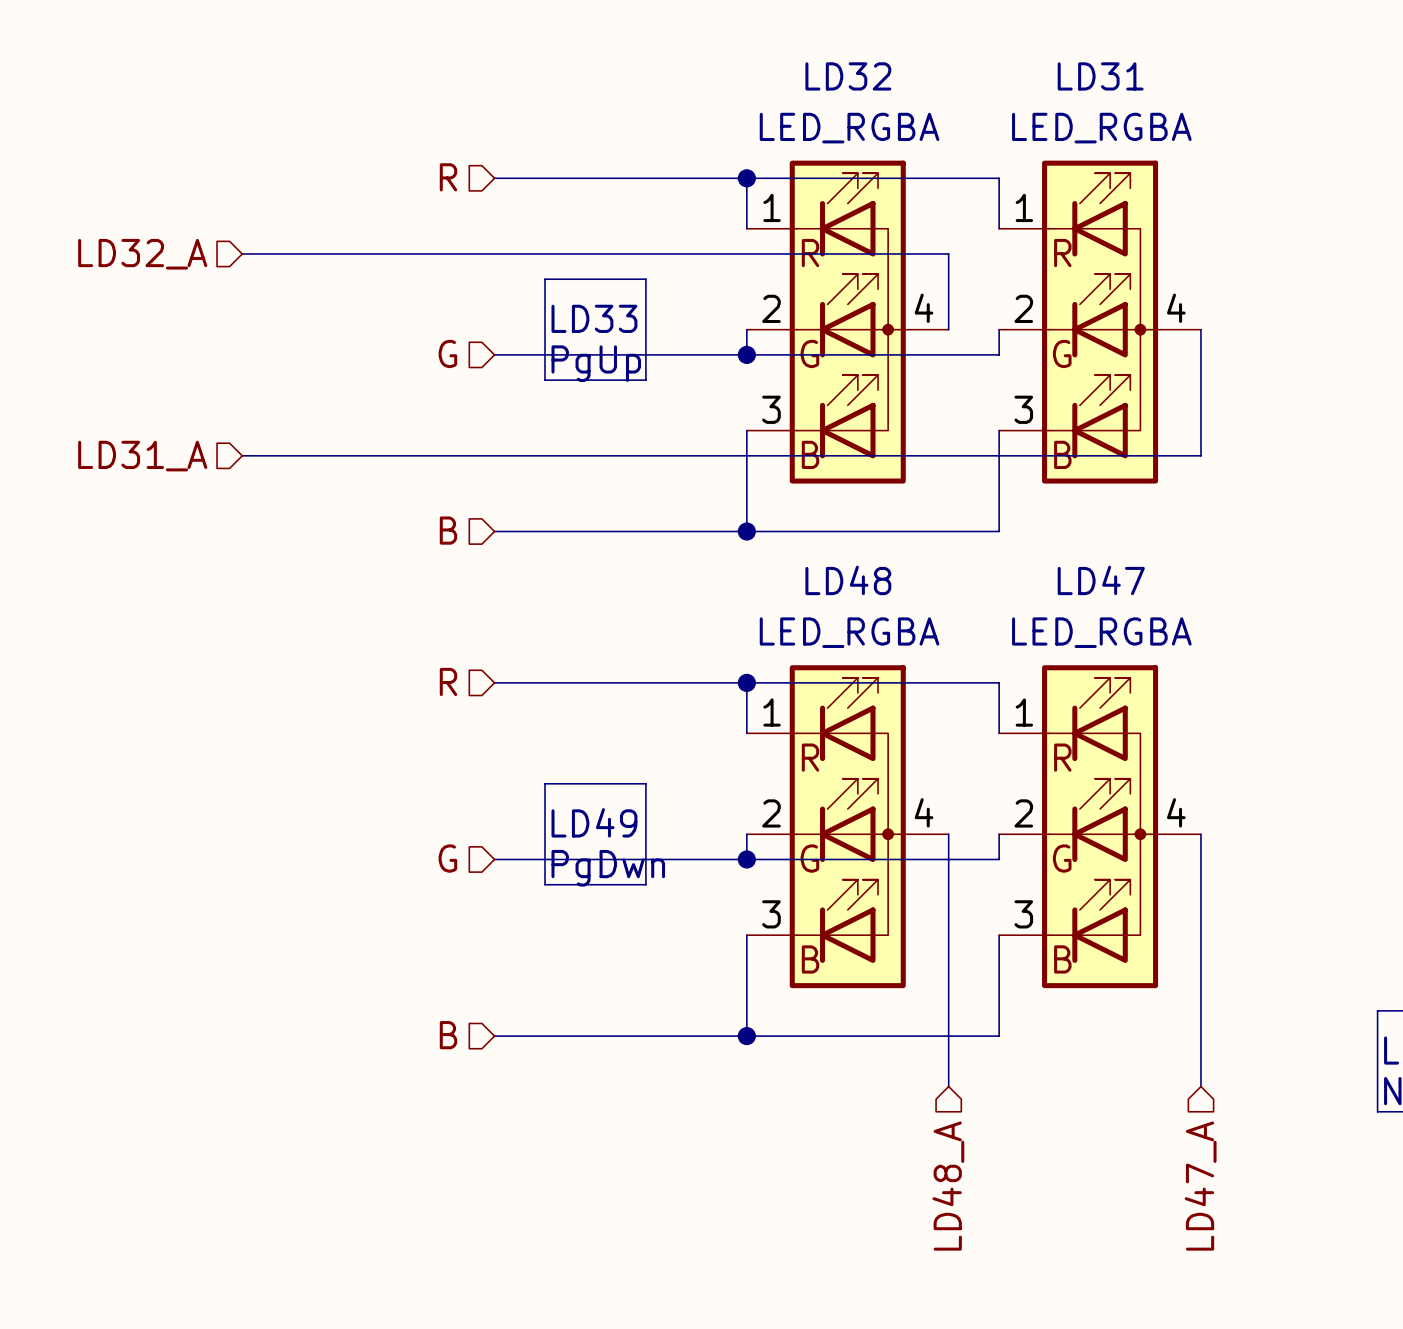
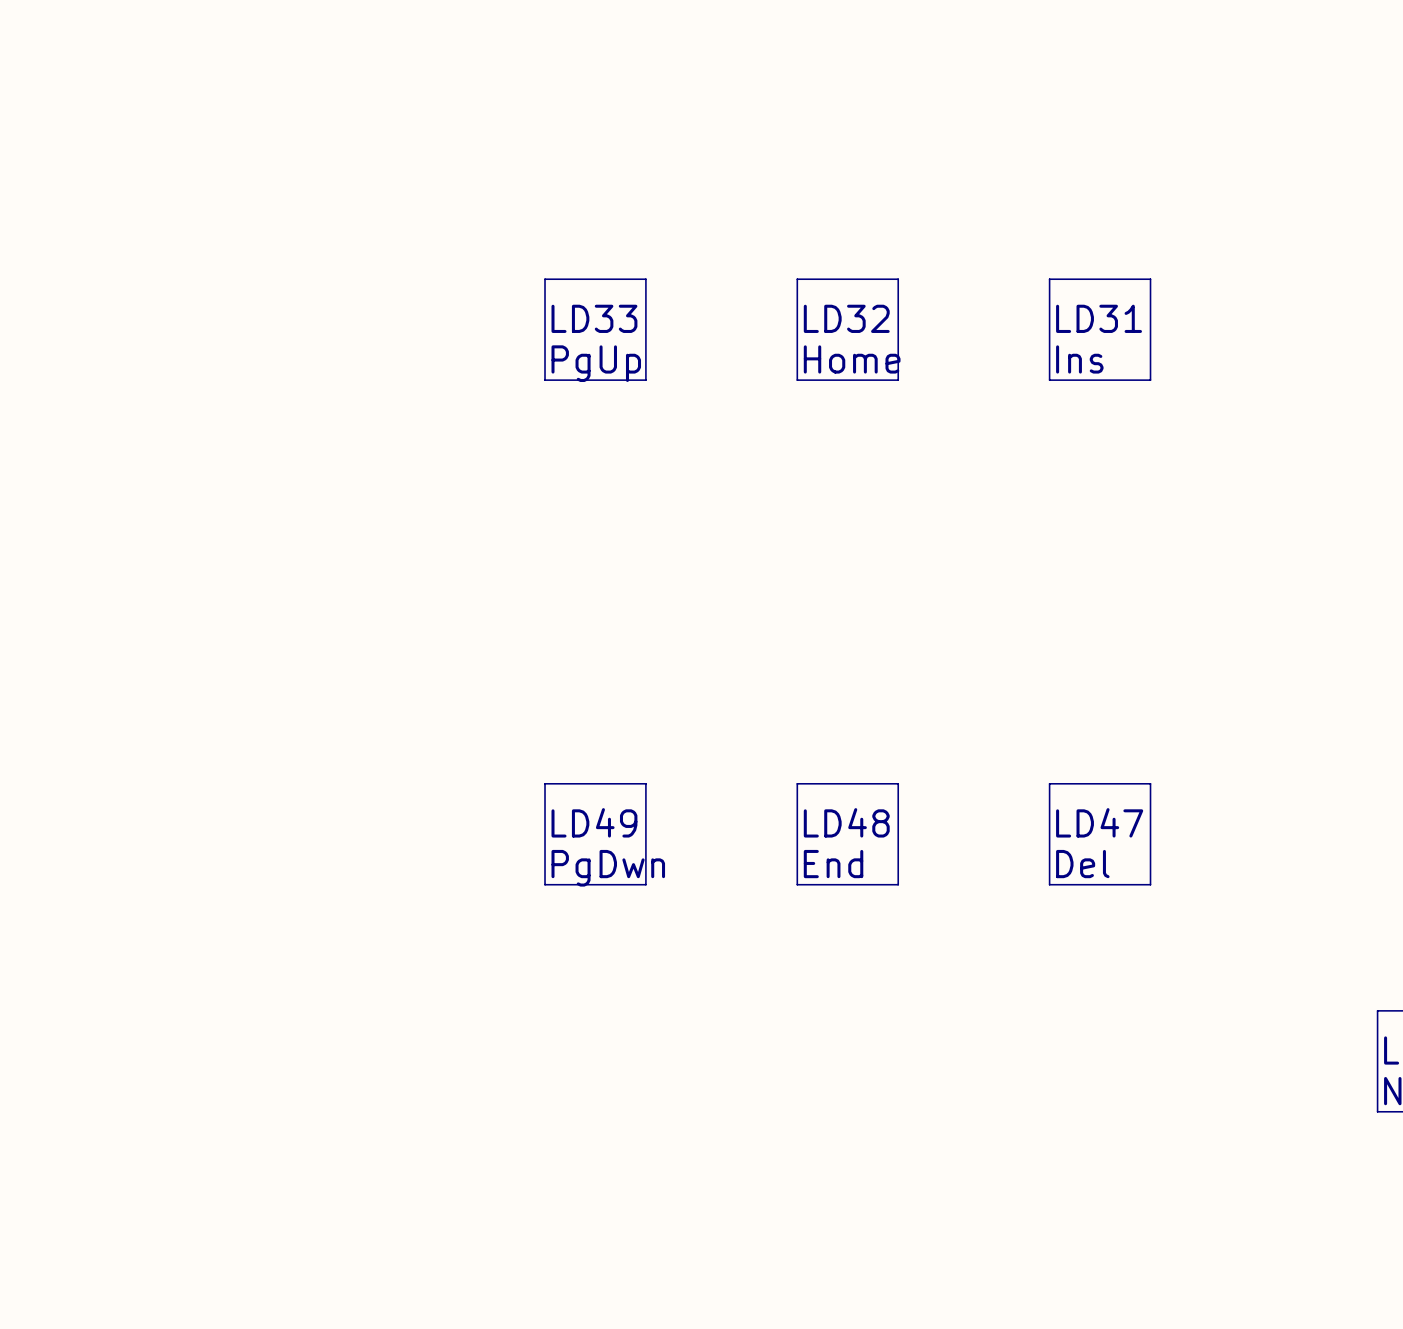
hierarchical label: R (448, 177) -> none
wire: (494, 178) (999, 178) (999, 228) -> none
wire: (746, 178) (746, 228) -> none
junction: (746, 178) -> none
wire: (242, 253) (948, 253) (948, 329) -> none
hierarchical label: LD32_A (142, 254) -> none
line: none -> (797, 279) (797, 380) (898, 380) (898, 279) (797, 279)
line: none -> (1049, 279) (1049, 380) (1150, 380) (1150, 279) (1049, 279)
text: none -> LD32 (846, 318)
text: none -> LD31 (1099, 318)
LD32: LED_RGBA (847, 322) -> none
LD31: LED_RGBA (1100, 322) -> none
wire: (746, 329) (746, 354) -> none
wire: (999, 329) (999, 354) (494, 354) -> none
wire: (1200, 329) (1200, 455) (242, 455) -> none
hierarchical label: G (447, 353) -> none
junction: (746, 354) -> none
text: none -> Home (852, 359)
text: none -> Ins (1079, 359)
wire: (746, 430) (746, 531) -> none
wire: (999, 430) (999, 531) (494, 531) -> none
hierarchical label: LD31_A (142, 456) -> none
hierarchical label: B (448, 530) -> none
junction: (746, 531) -> none
hierarchical label: R (448, 681) -> none
wire: (494, 682) (999, 682) (999, 733) -> none
wire: (746, 682) (746, 733) -> none
junction: (746, 682) -> none
line: none -> (797, 783) (898, 783) (898, 884) (797, 884) (797, 783)
line: none -> (1049, 783) (1150, 783) (1150, 884) (1049, 884) (1049, 783)
text: none -> LD48 (846, 822)
text: none -> LD47 (1099, 822)
LD48: LED_RGBA (847, 826) -> none
LD47: LED_RGBA (1100, 826) -> none
wire: (746, 834) (746, 859) -> none
wire: (948, 834) (948, 1086) -> none
wire: (999, 834) (999, 859) (494, 859) -> none
wire: (1200, 834) (1200, 1086) -> none
hierarchical label: G (447, 858) -> none
junction: (746, 859) -> none
text: none -> End (833, 864)
text: none -> Del (1082, 864)
wire: (746, 935) (746, 1036) -> none
wire: (999, 935) (999, 1036) (494, 1036) -> none
hierarchical label: B (448, 1035) -> none
junction: (746, 1036) -> none
hierarchical label: LD48_A (948, 1186) -> none
hierarchical label: LD47_A (1200, 1186) -> none

